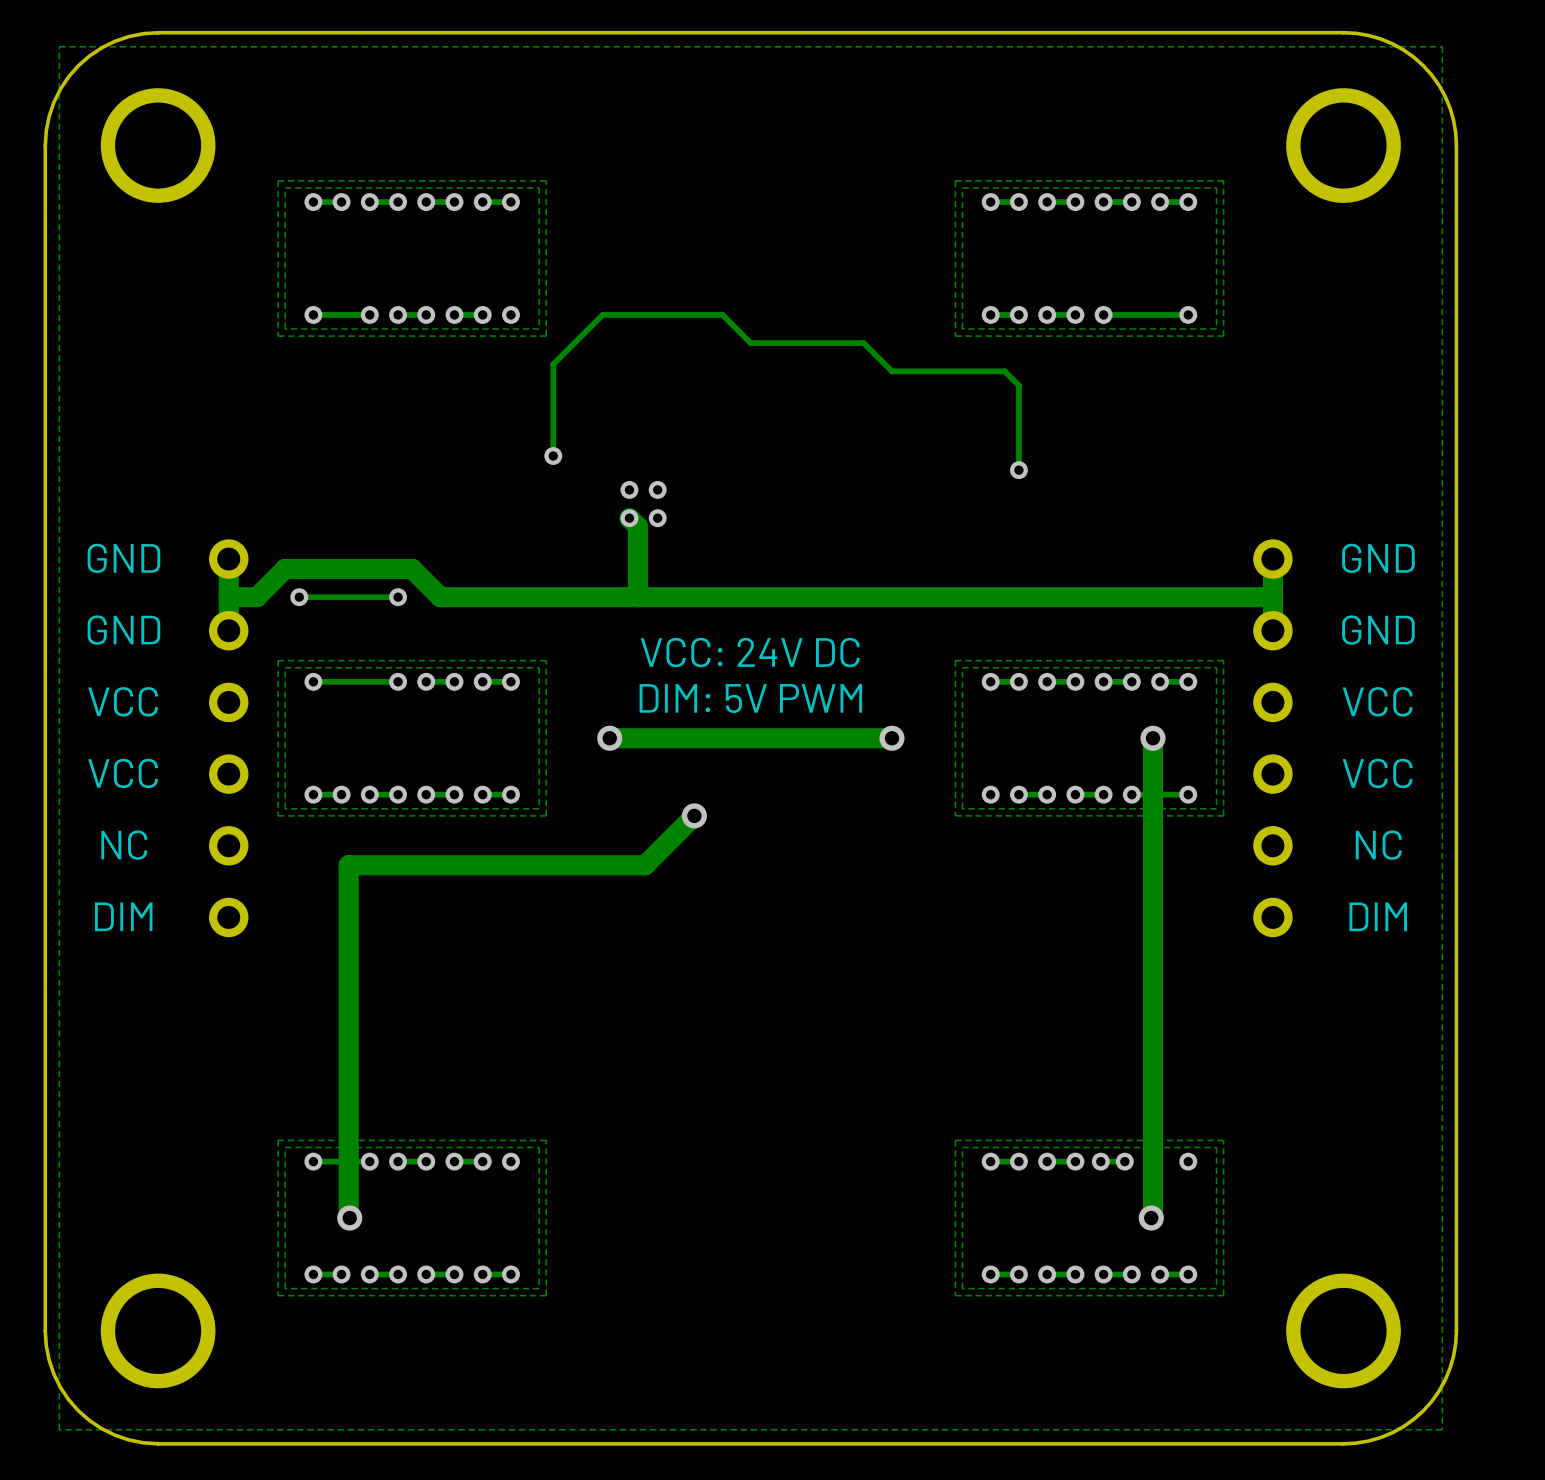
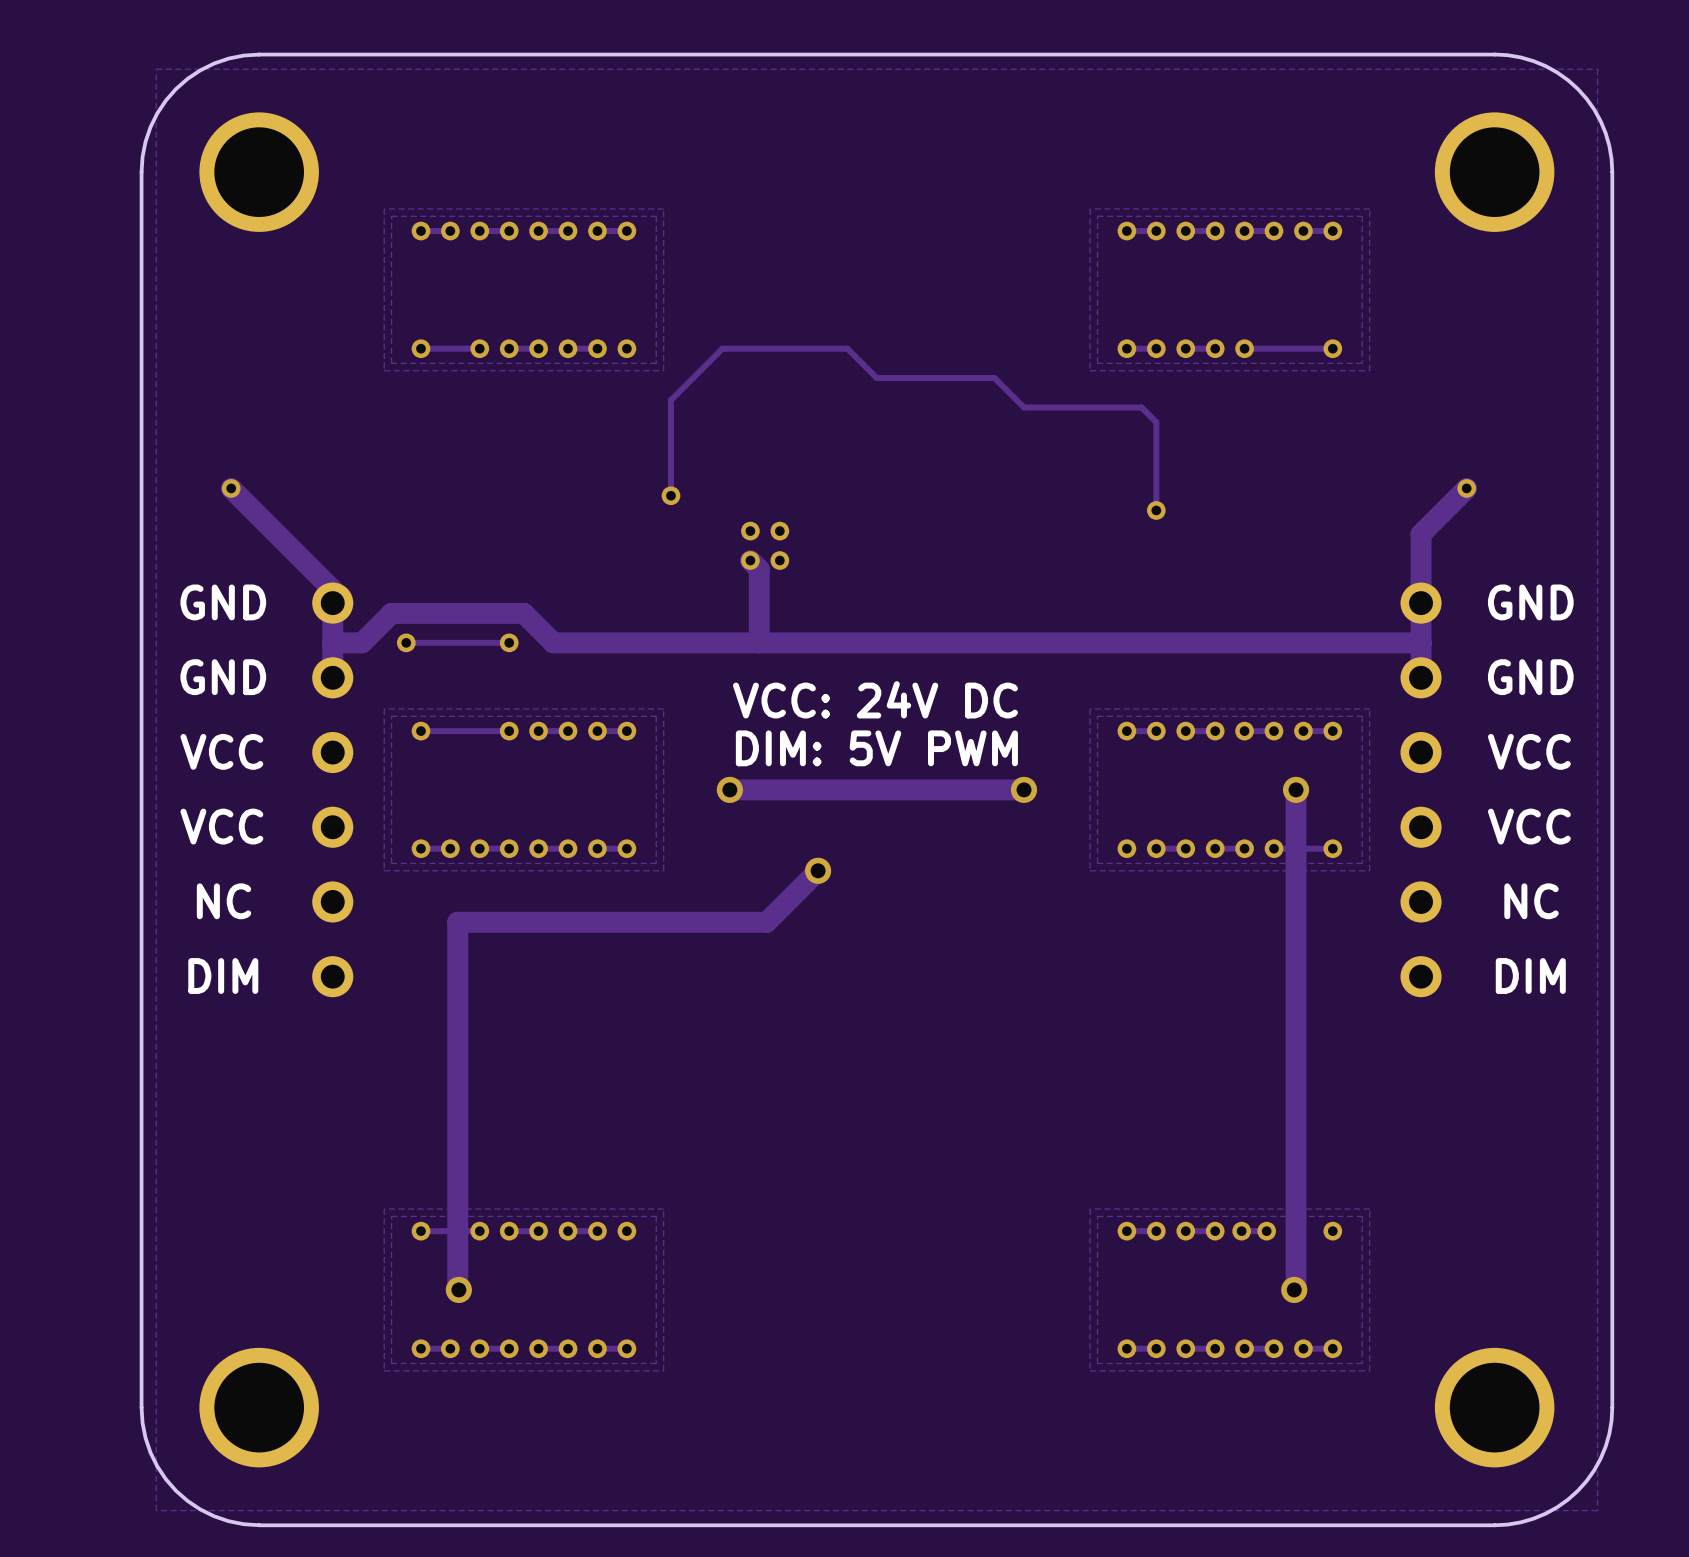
track: none -> (231, 488) (332, 589) (332, 603)
via: none -> (231, 488)
track: none -> (1466, 488) (1421, 534) (1421, 603)
via: none -> (1466, 488)

